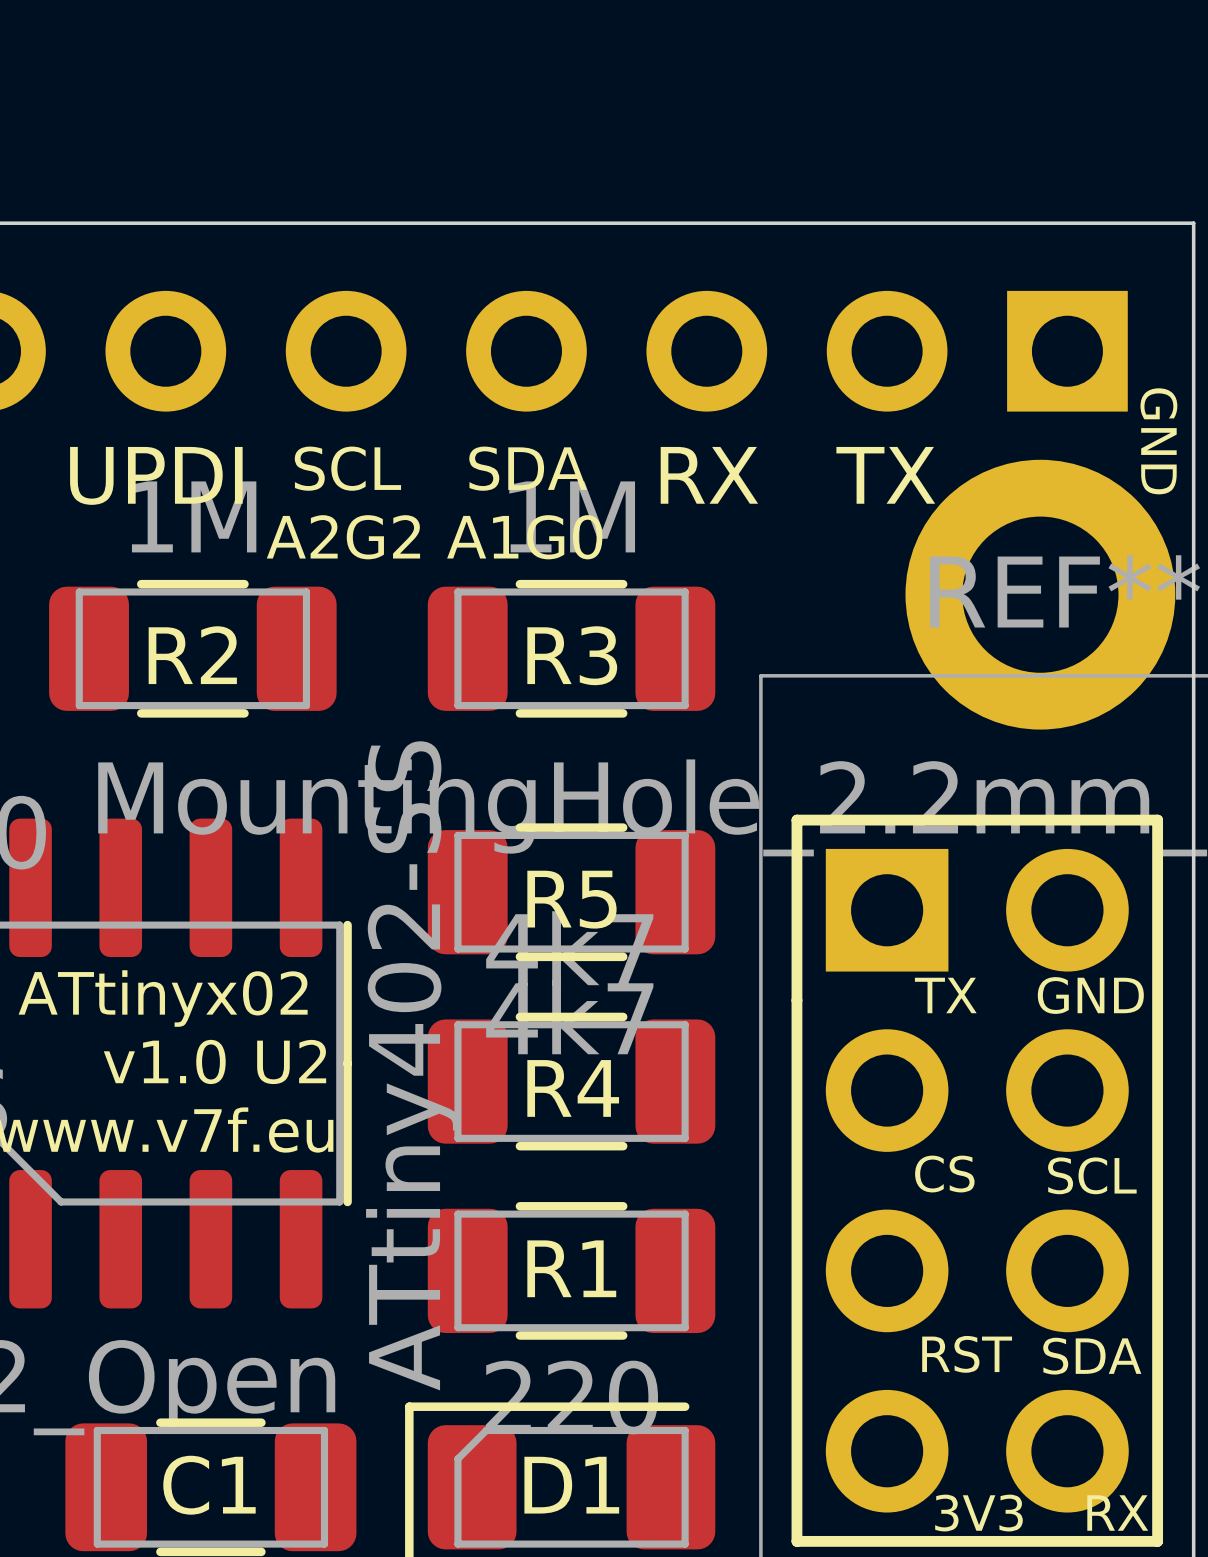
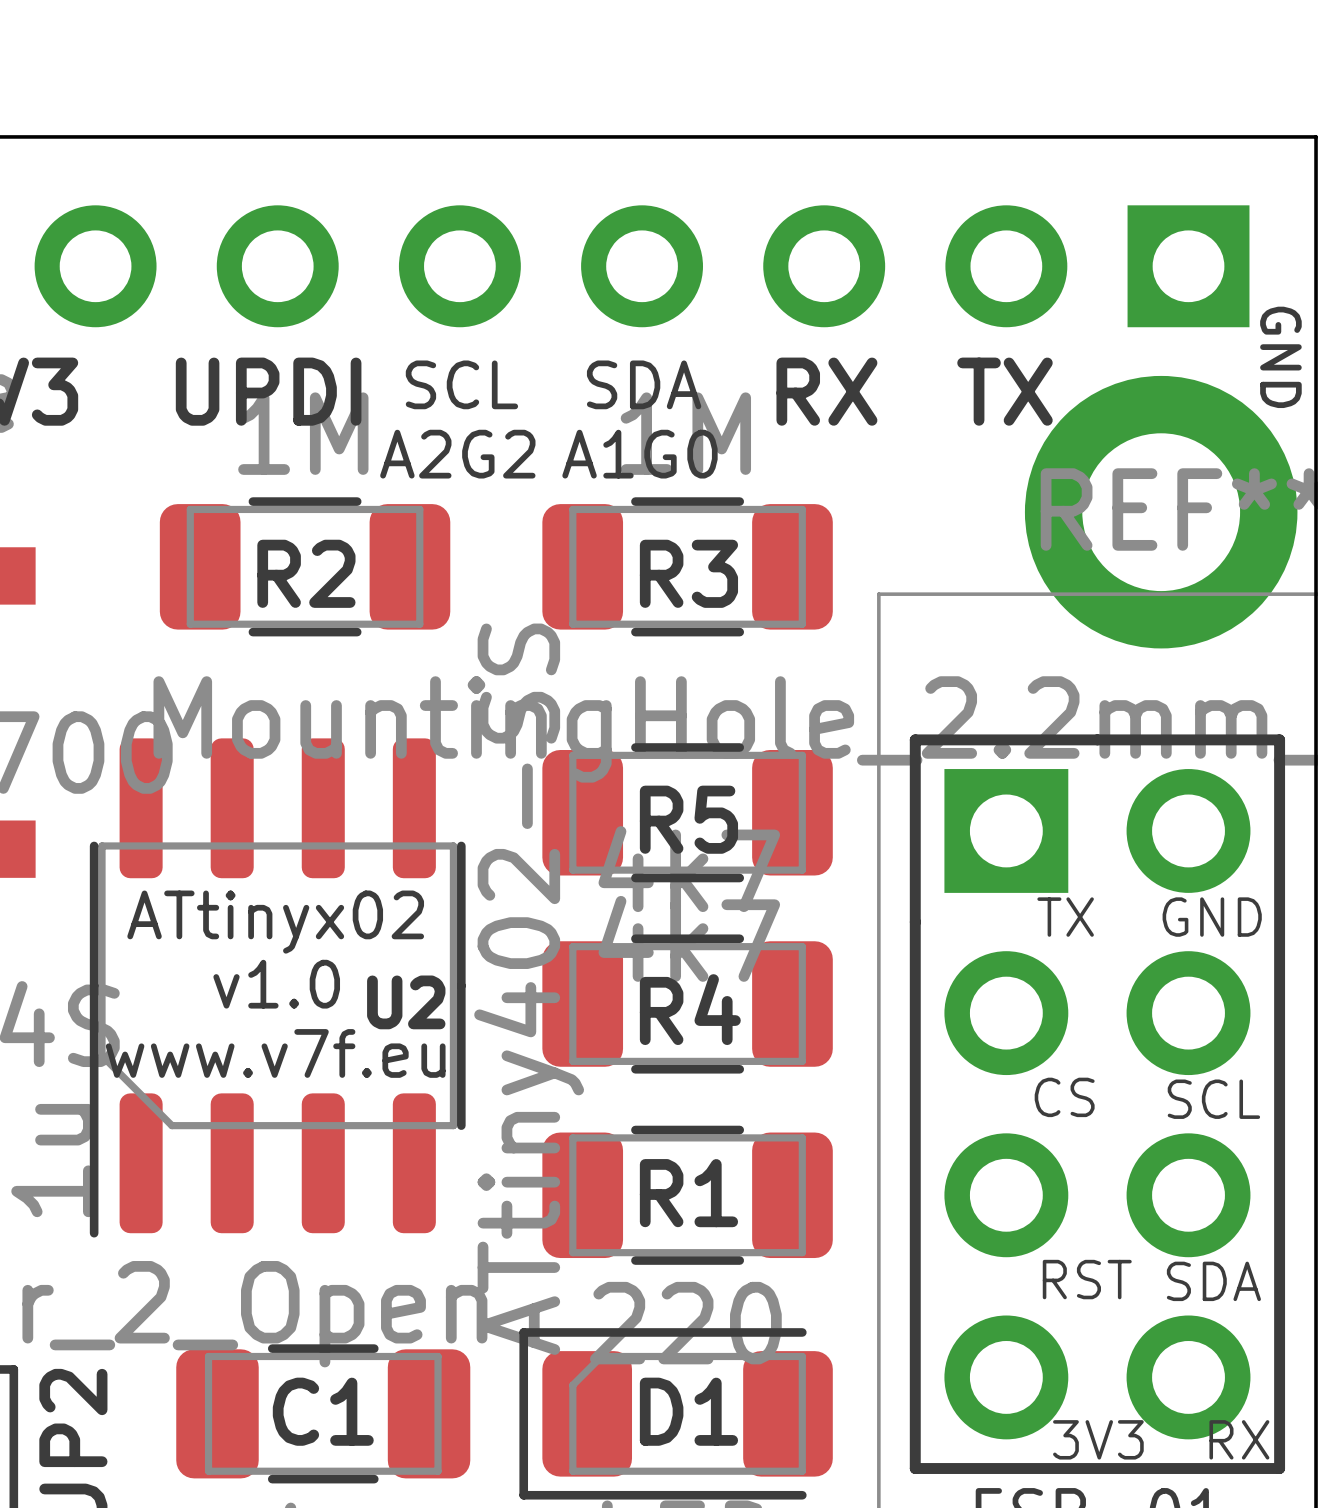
U2 name position: U2 (291, 1061) -> U2 (406, 1002)

